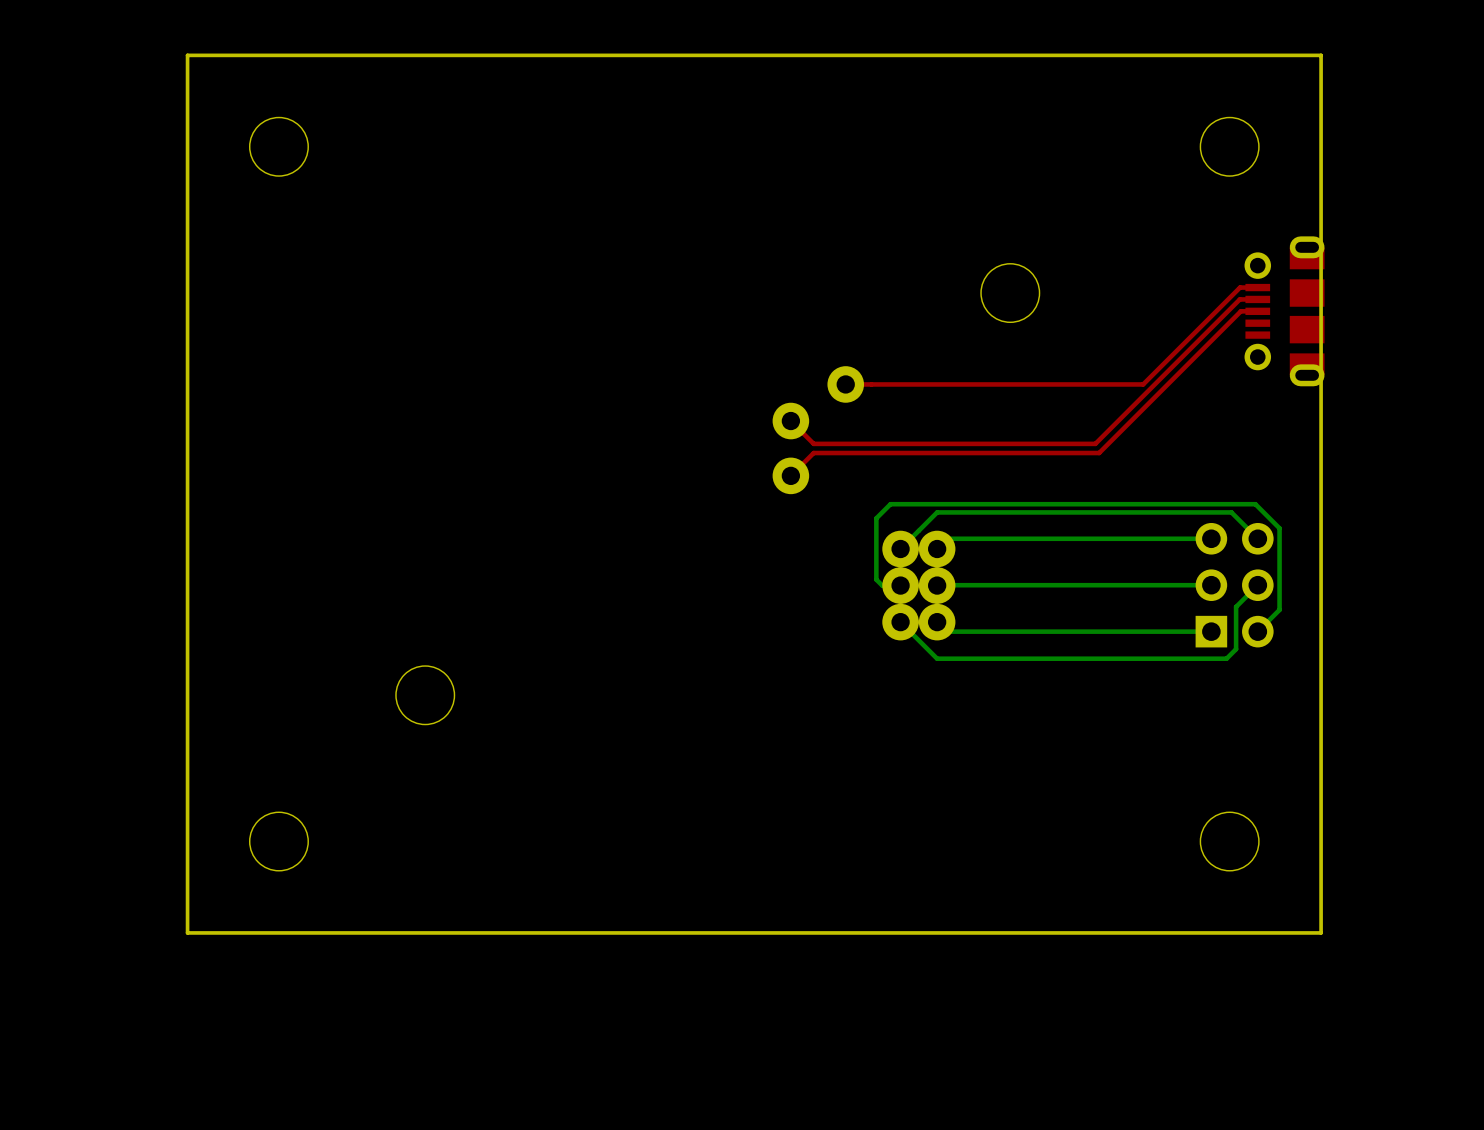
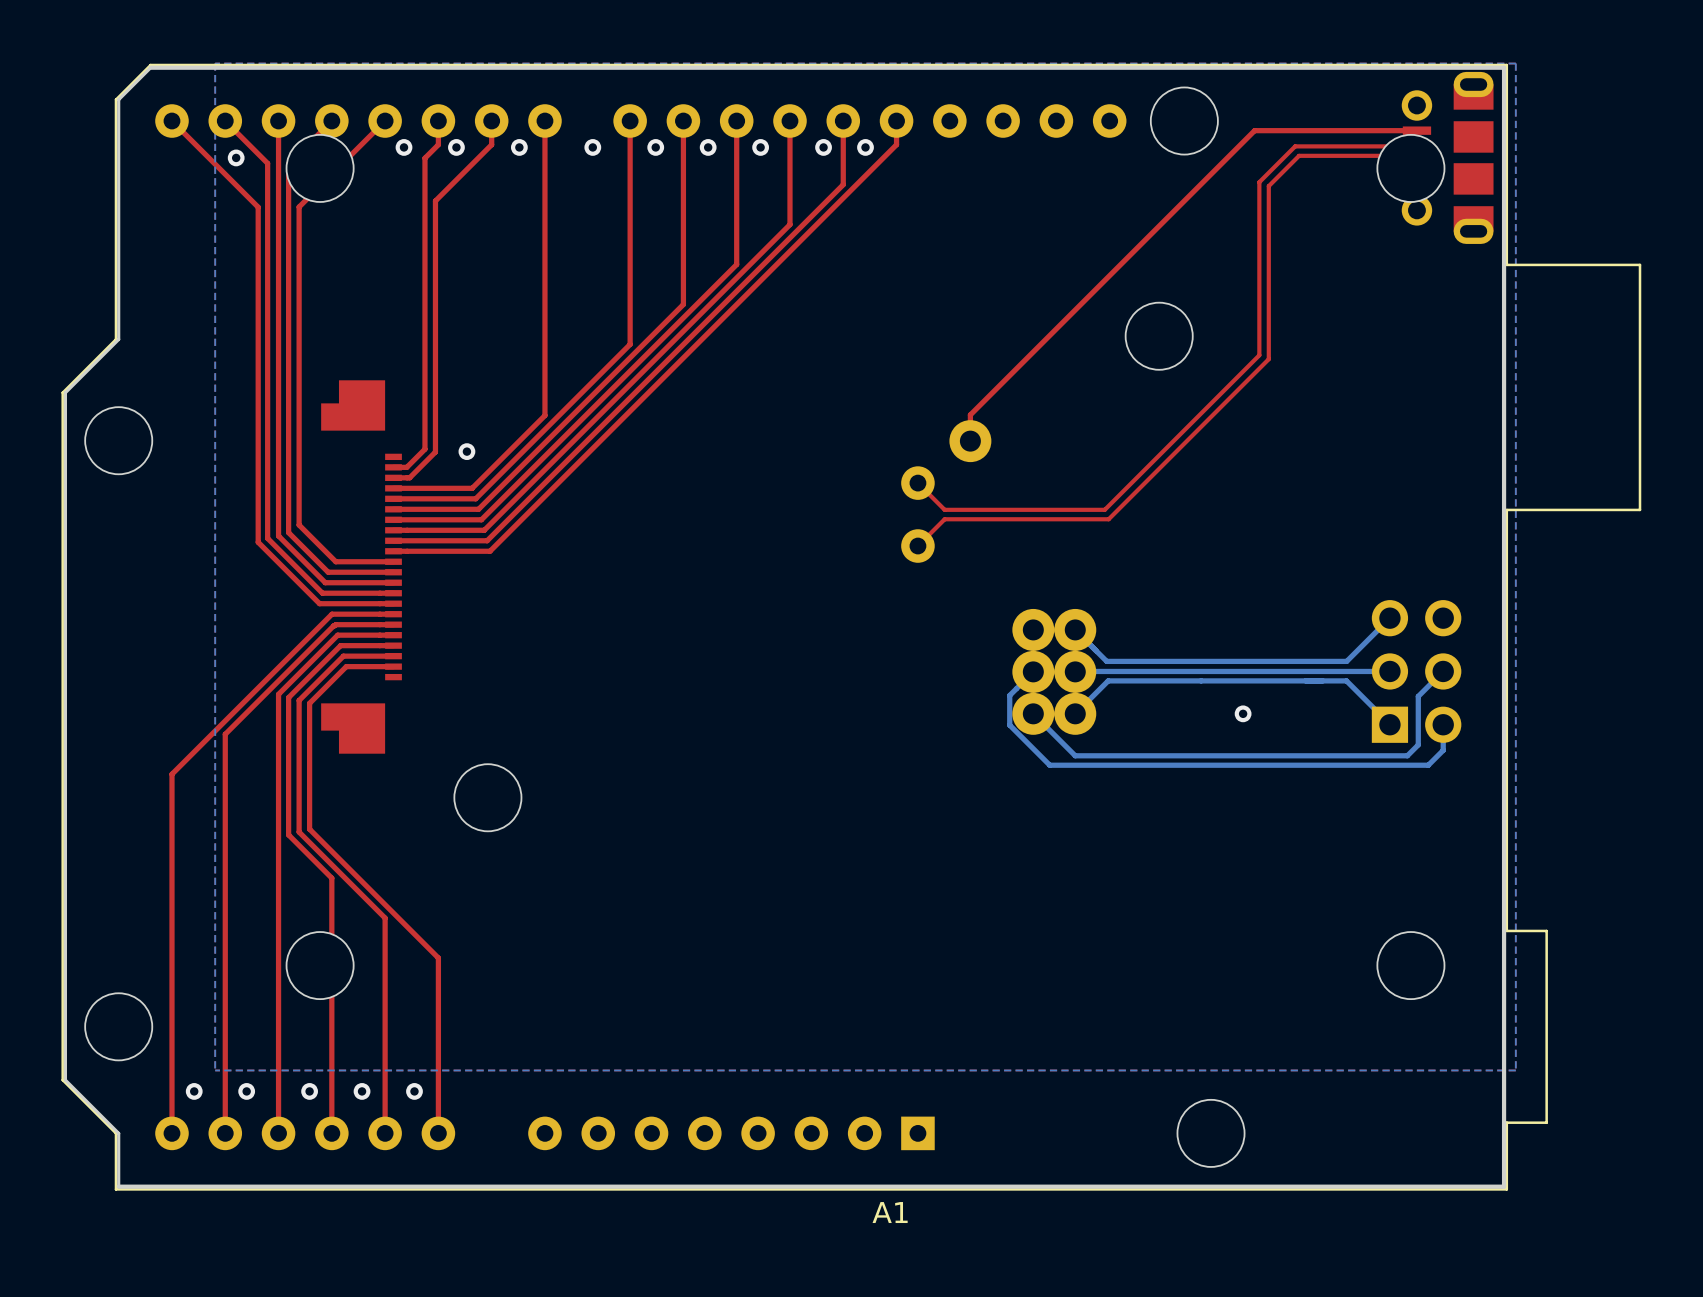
board edge: (1321, 55) (187, 55) (187, 932) (1321, 932) (1321, 55) -> (1504, 67) (1504, 1186) (118, 1186) (118, 1133) (65, 1080) (65, 392) (118, 339) (118, 99) (150, 67) (1504, 67)
top track: none -> (171, 121) (258, 207) (258, 542) (319, 603) (393, 603)
top track: none -> (225, 121) (267, 163) (267, 538) (322, 593) (393, 593)
top track: none -> (278, 121) (278, 535) (325, 582) (393, 582)
top track: none -> (331, 121) (288, 164) (288, 532) (328, 572) (393, 572)
top track: none -> (385, 121) (299, 207) (299, 525) (335, 561) (393, 561)
top track: none -> (438, 121) (438, 144) (424, 158) (424, 449) (406, 467) (393, 467)
top track: none -> (491, 121) (491, 144) (435, 200) (435, 452) (409, 477) (393, 477)
top track: none -> (544, 121) (544, 415) (472, 488) (393, 488)
top track: none -> (630, 121) (630, 344) (475, 498) (393, 498)
top track: none -> (683, 121) (683, 304) (478, 509) (393, 509)
top track: none -> (736, 121) (736, 264) (481, 519) (393, 519)
top track: none -> (789, 121) (789, 224) (484, 530) (393, 530)
top track: none -> (843, 121) (843, 184) (487, 540) (393, 540)
top track: none -> (896, 121) (896, 144) (490, 551) (393, 551)
top track: none -> (1416, 144) (1395, 144) (1393, 146) (1295, 146) (1259, 182) (1259, 355) (1104, 509) (944, 509) (917, 483)
via: none -> (404, 147)
via: none -> (456, 147)
via: none -> (519, 147)
via: none -> (592, 147)
via: none -> (655, 147)
via: none -> (708, 147)
via: none -> (760, 147)
via: none -> (823, 147)
via: none -> (865, 147)
via: none -> (236, 157)
top track: none -> (1416, 157) (1395, 157) (1393, 155) (1299, 155) (1268, 186) (1268, 359) (1108, 519) (944, 519) (917, 546)
top track: (1257, 287) (1240, 287) (1143, 384) (845, 384) -> (1416, 130) (1254, 130) (970, 414) (970, 441)
top track: (1257, 299) (1239, 299) (1095, 443) (813, 443) (790, 421) -> none
top track: (1257, 311) (1240, 311) (1099, 453) (813, 453) (790, 475) -> none
part position: (1284, 311) -> (1447, 157)
via: none -> (466, 451)
part footprint: [772, 402, 810, 440] -> [901, 466, 935, 500]
part footprint: [772, 457, 810, 495] -> [901, 529, 935, 563]
part: none -> (361, 566)
top track: none -> (393, 614) (332, 614) (171, 774) (171, 1133)
bottom track: (1211, 538) (947, 538) (937, 549) -> (1389, 618) (1346, 661) (1106, 661) (1075, 629)
bottom track: (1257, 538) (1231, 512) (937, 512) (900, 549) -> none
top track: none -> (393, 624) (333, 625) (225, 734) (225, 1133)
A1: none -> (851, 627)
top track: none -> (393, 635) (337, 635) (278, 694) (278, 1133)
top track: none -> (393, 645) (340, 645) (288, 697) (288, 834) (331, 878) (331, 1133)
top track: none -> (393, 656) (343, 656) (299, 700) (299, 832) (385, 918) (385, 1133)
top track: none -> (393, 666) (346, 666) (309, 703) (309, 829) (438, 958) (438, 1133)
bottom track: (900, 585) (882, 585) (876, 579) (876, 518) (890, 504) (1255, 504) (1279, 528) (1279, 609) (1257, 631) -> (1033, 671) (1009, 695) (1009, 725) (1049, 765) (1428, 765) (1443, 750) (1443, 724)
bottom track: (937, 622) (946, 631) (1211, 631) -> (1075, 713) (1108, 680) (1346, 680) (1389, 724)
via: none -> (1243, 713)
via: none -> (194, 1091)
via: none -> (246, 1091)
via: none -> (309, 1091)
via: none -> (362, 1091)
via: none -> (414, 1091)

